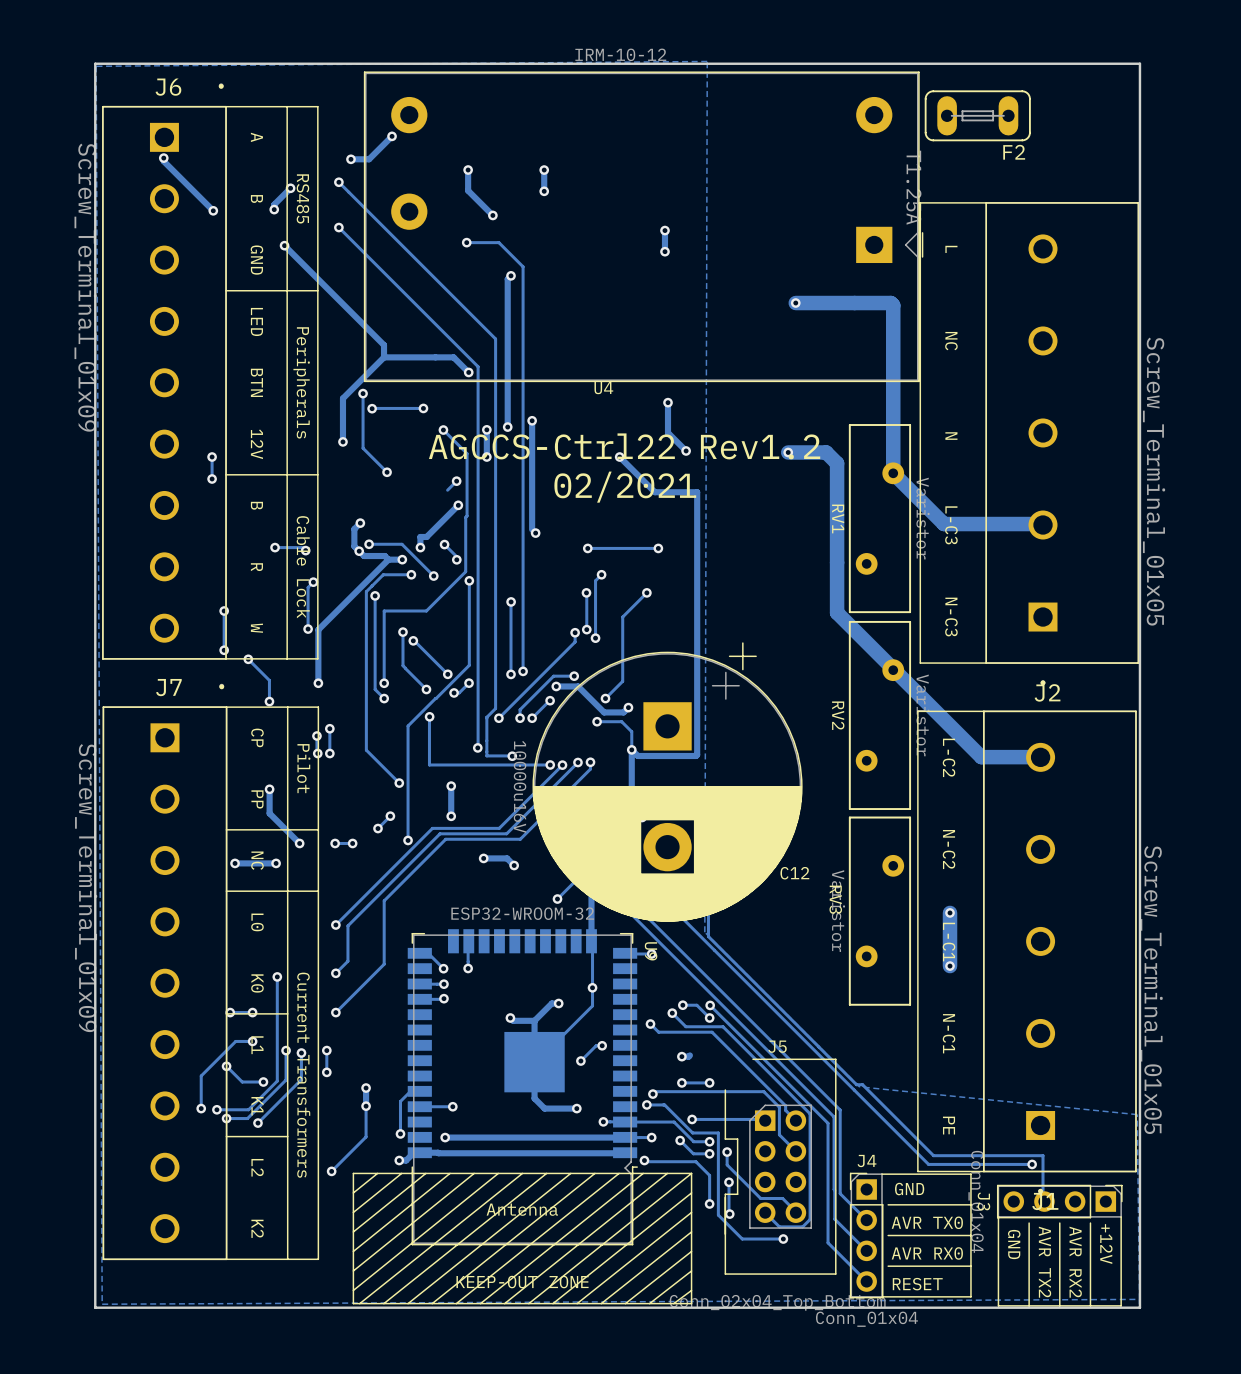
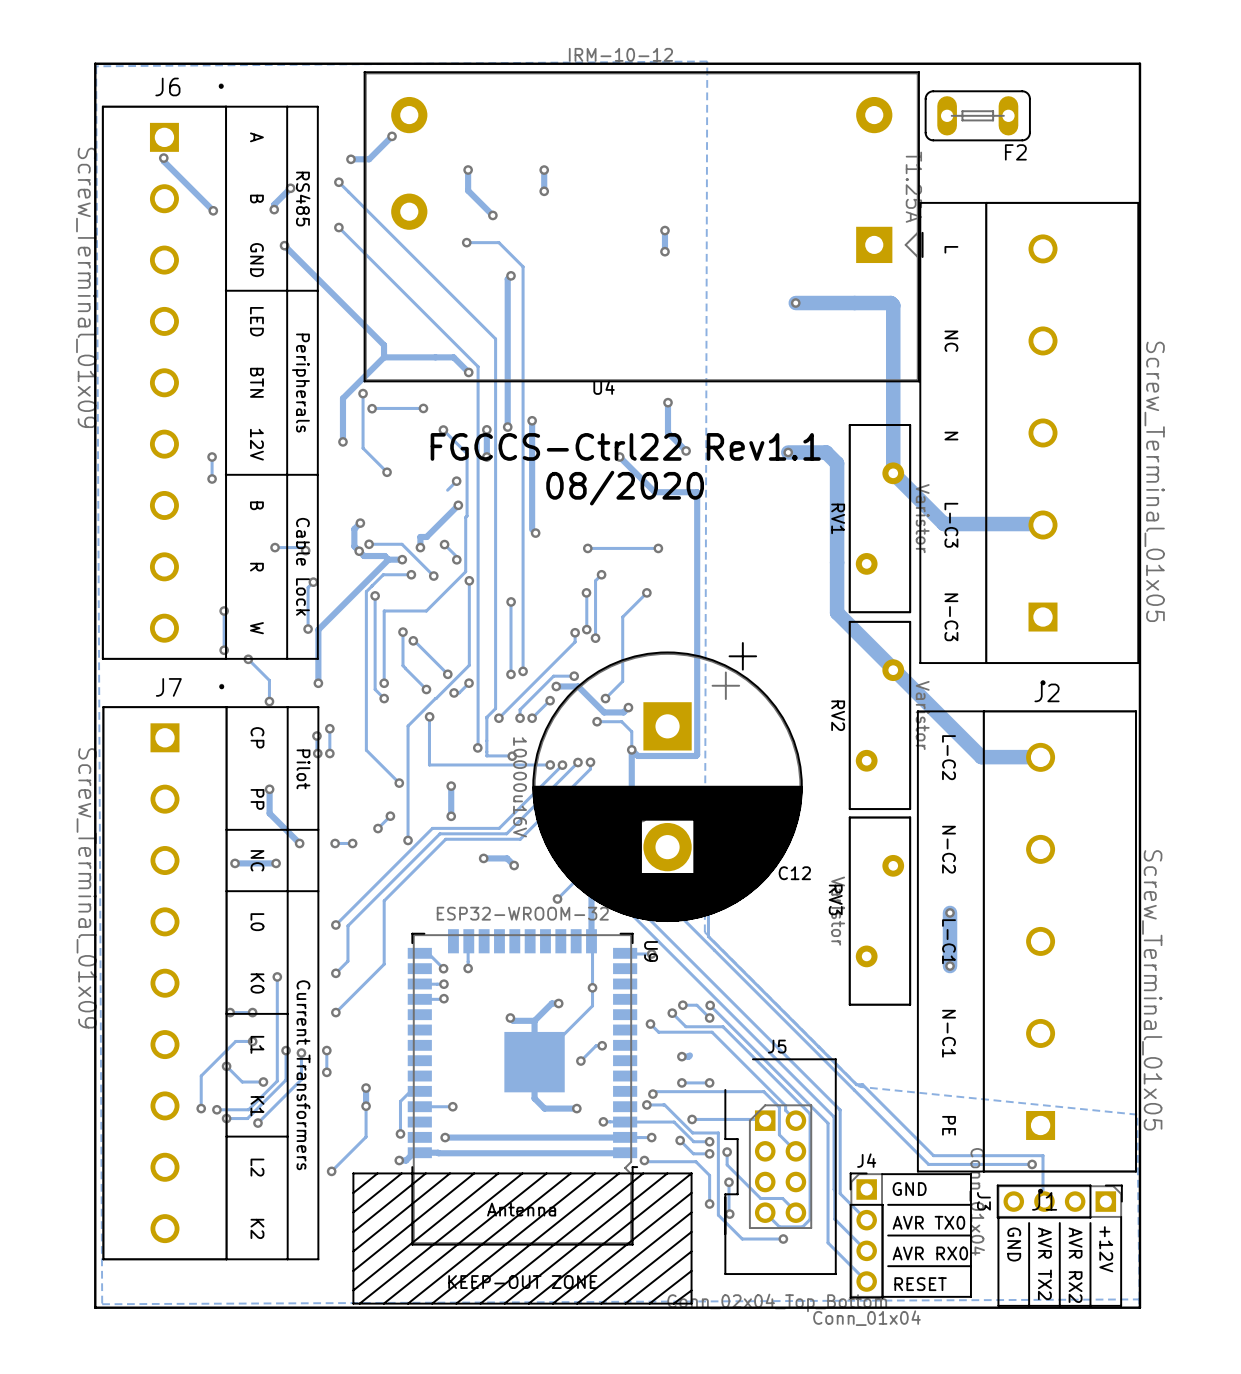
text: AGCCS-Ctrl22 Rev1.2 (624, 446) -> FGCCS-Ctrl22 Rev1.1 (625, 446)
text: 02/2021 (625, 487) -> 08/2020 (625, 488)

